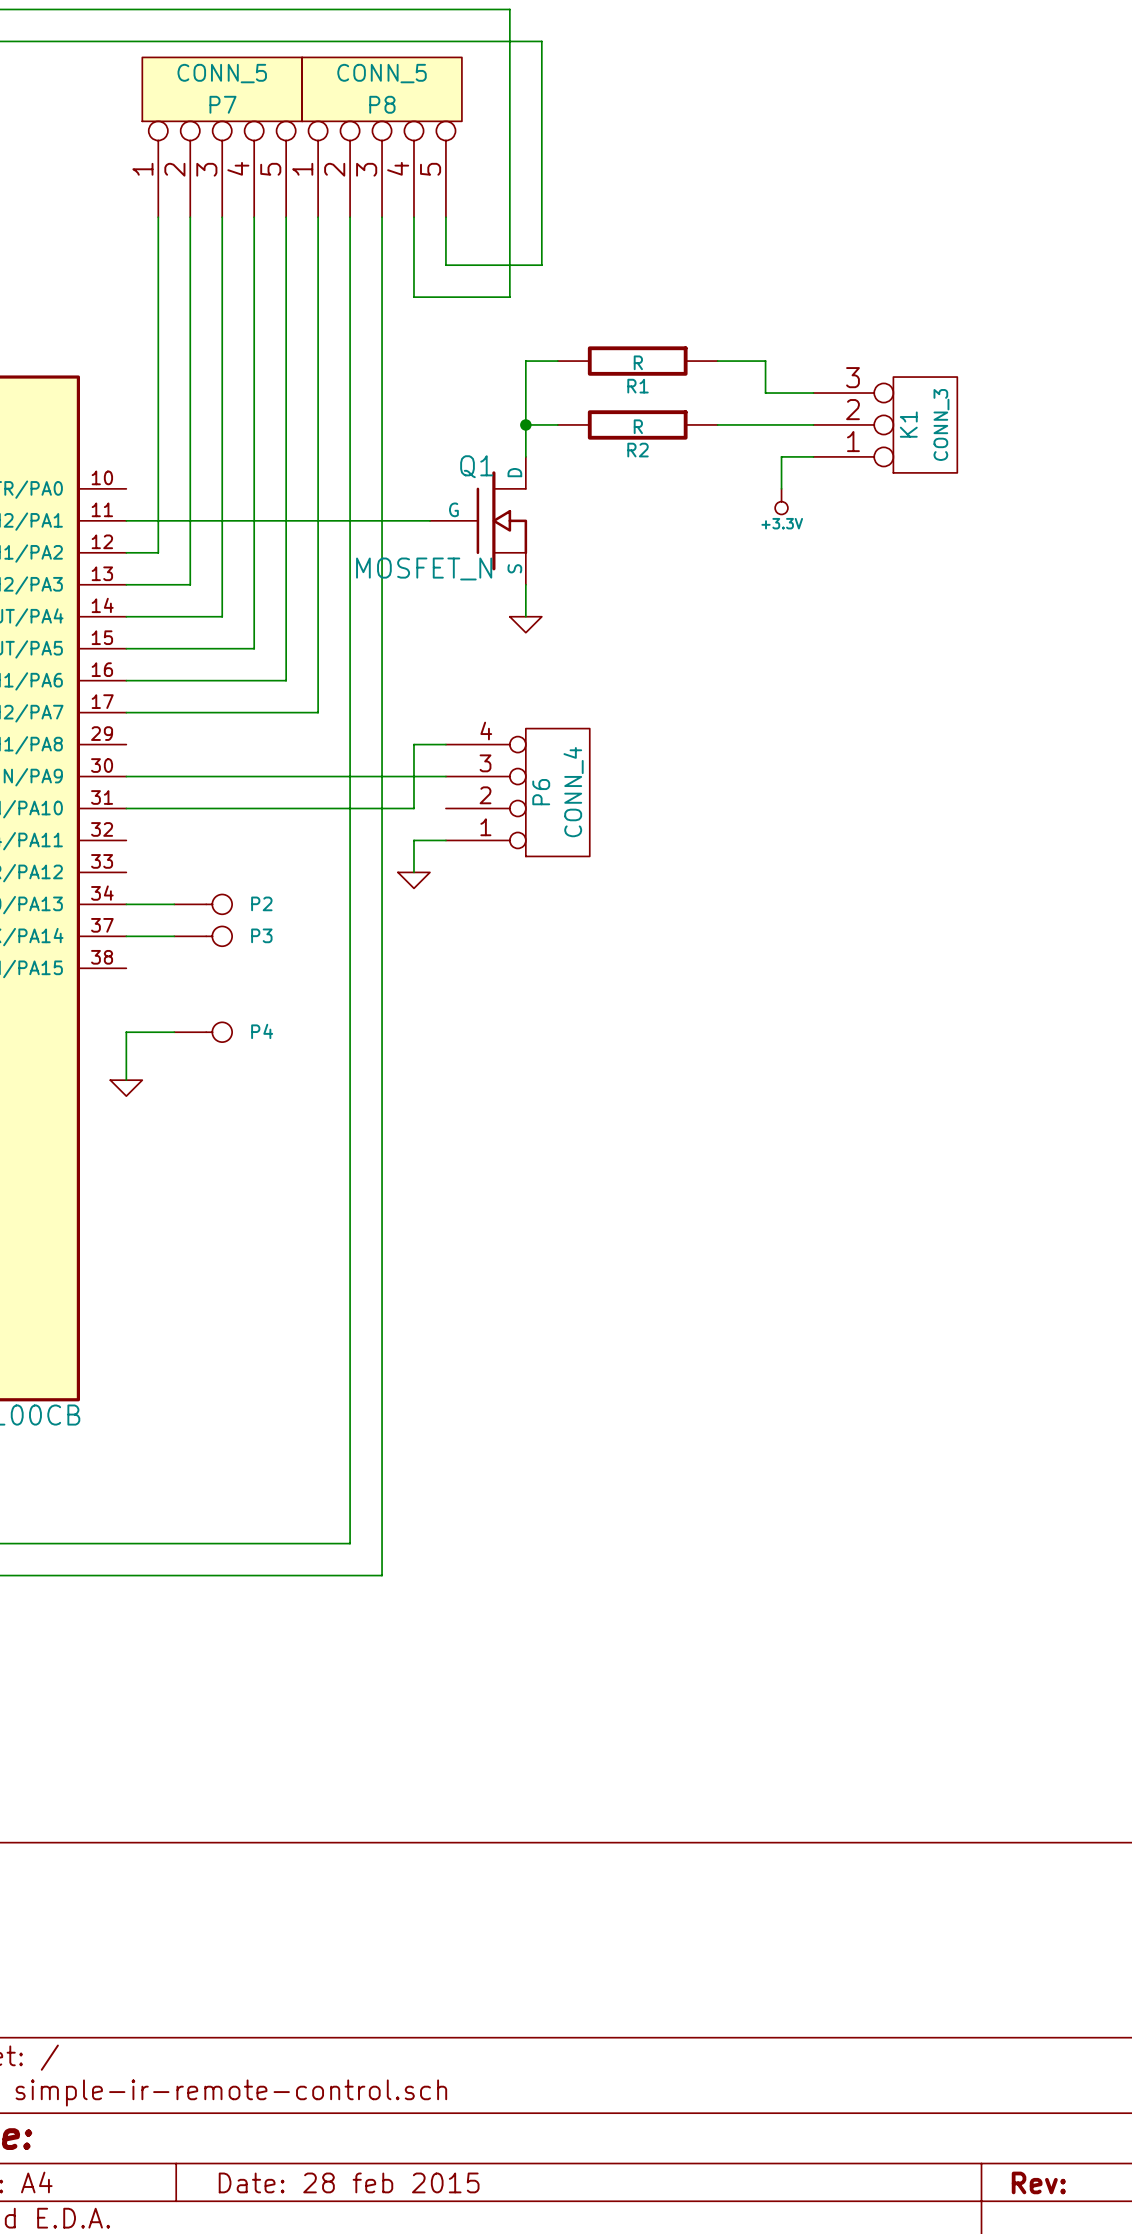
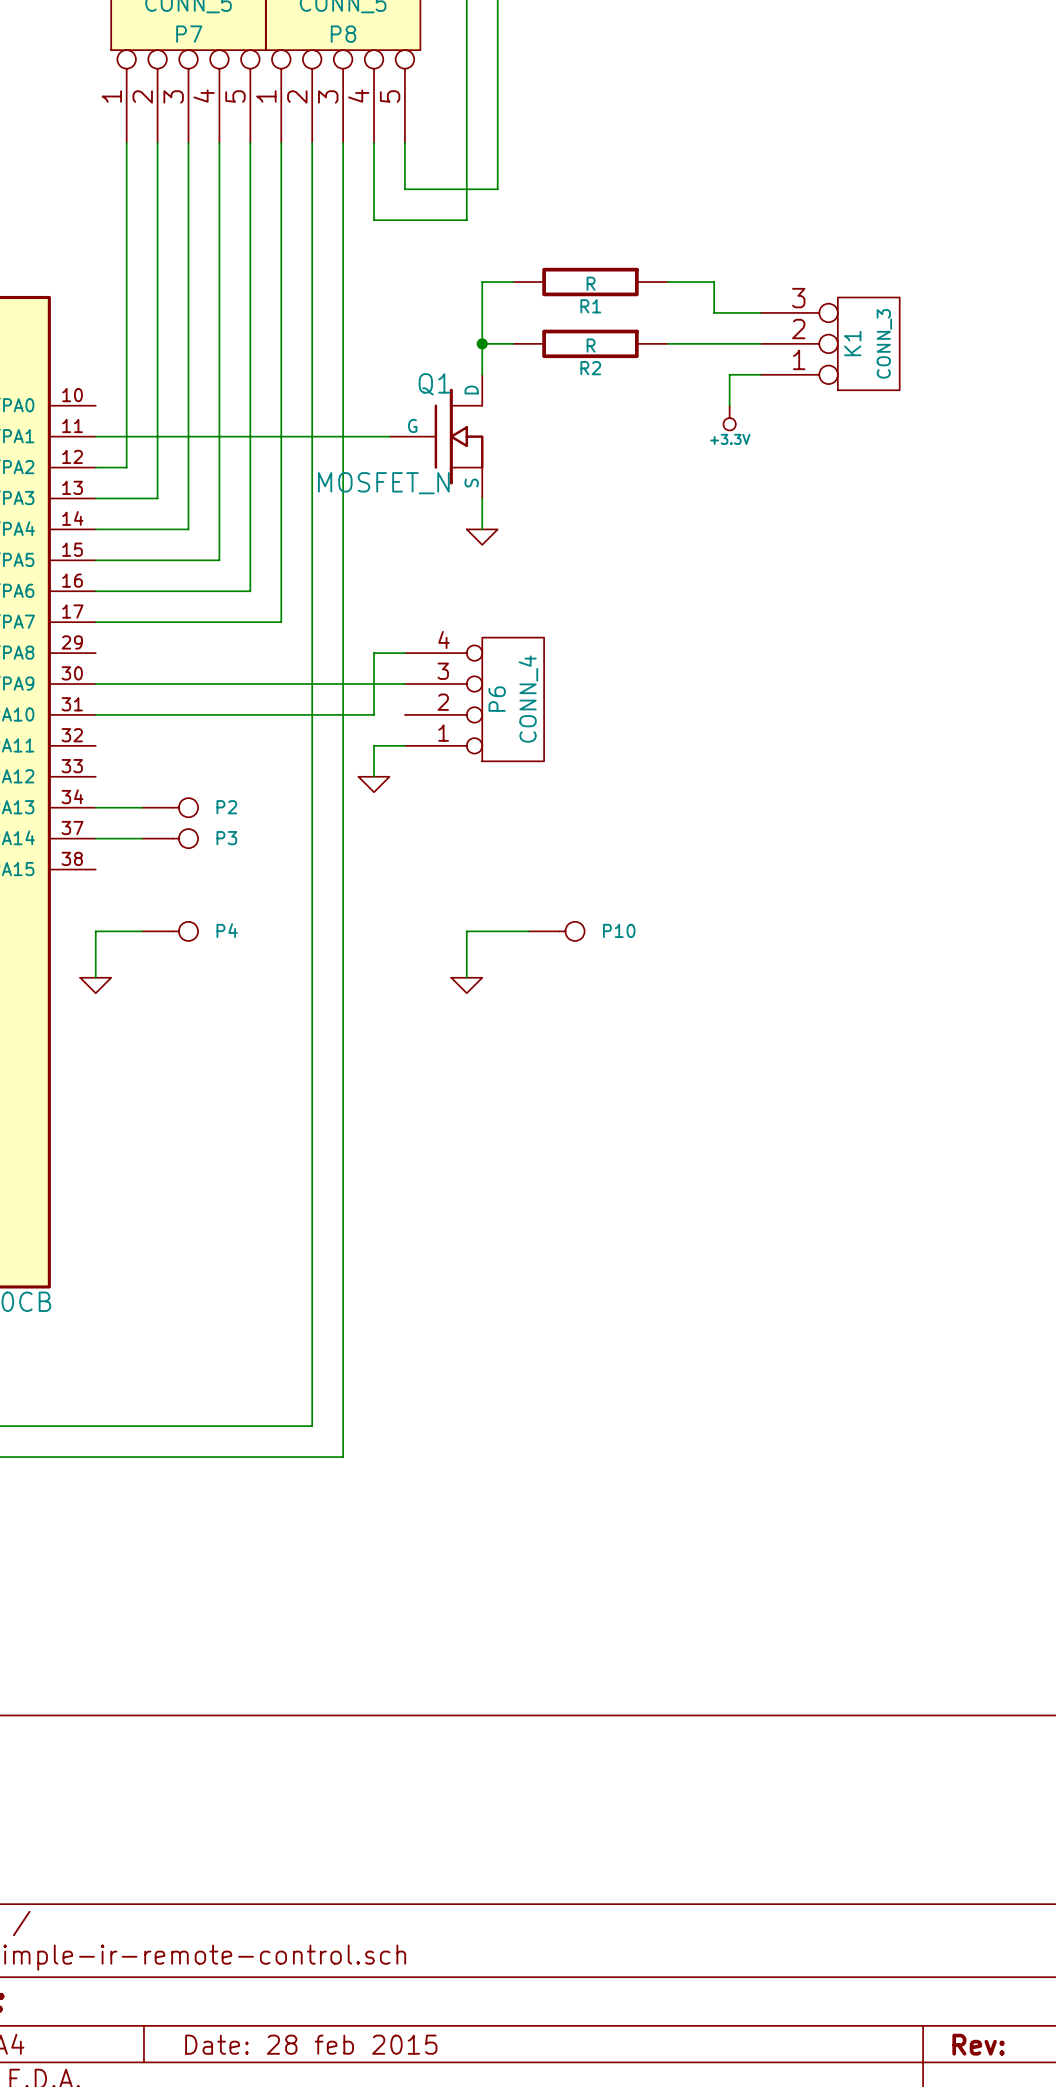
wire: none -> (528, 931) (466, 931) (466, 977)
P10: none -> (556, 931)
power symbol: none -> (466, 985)

